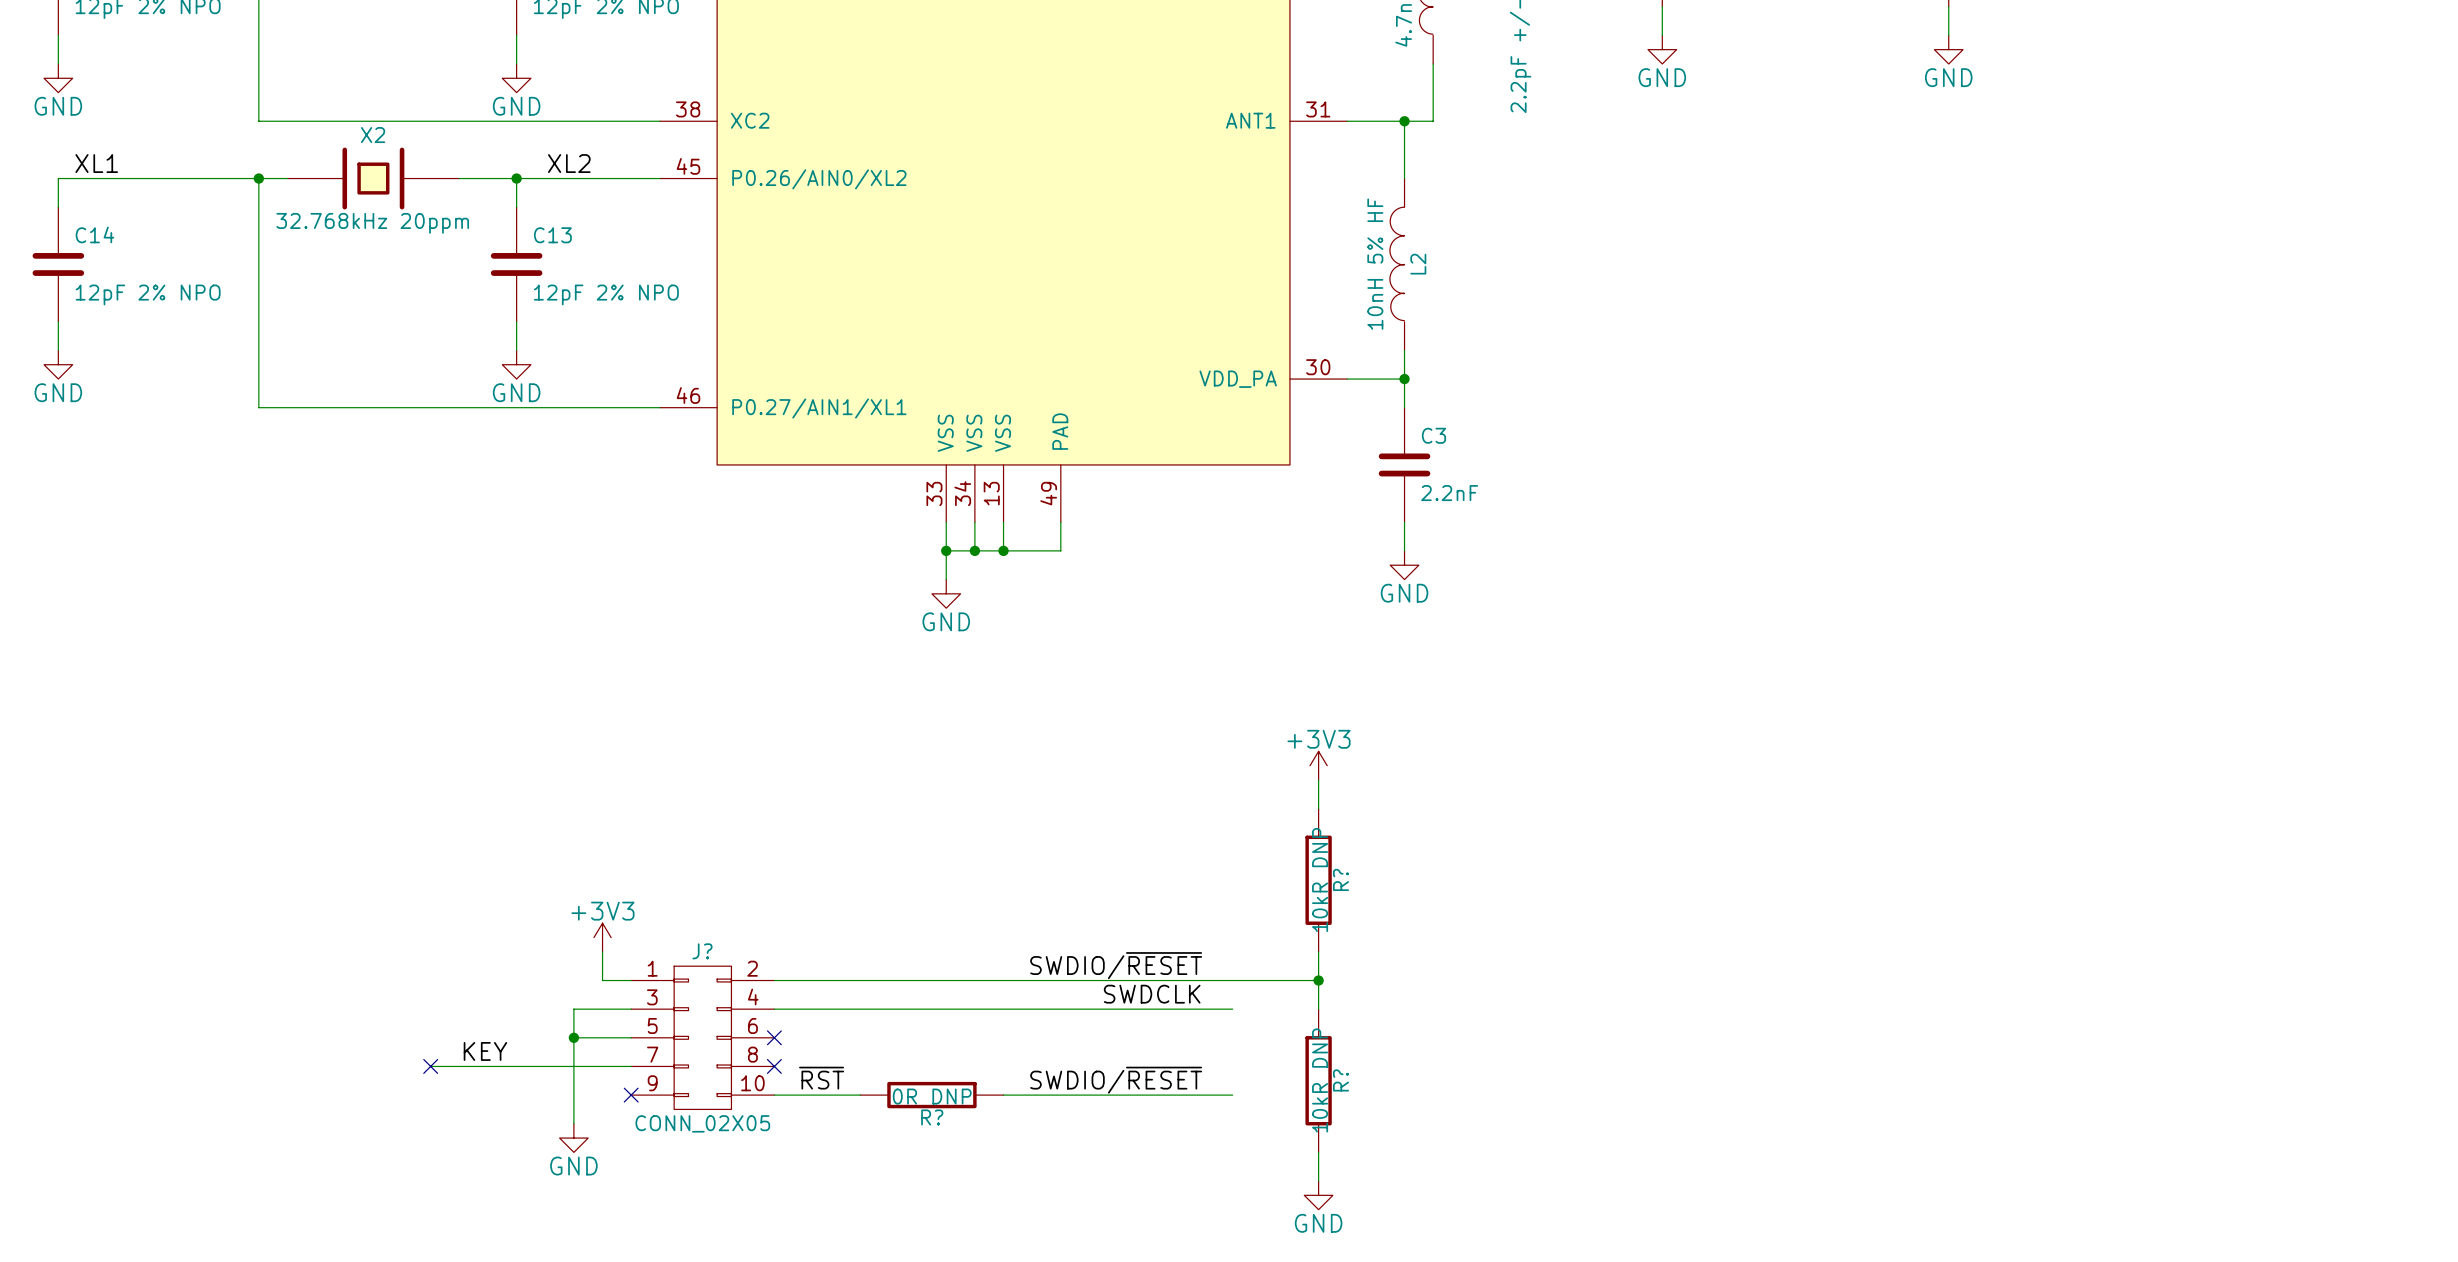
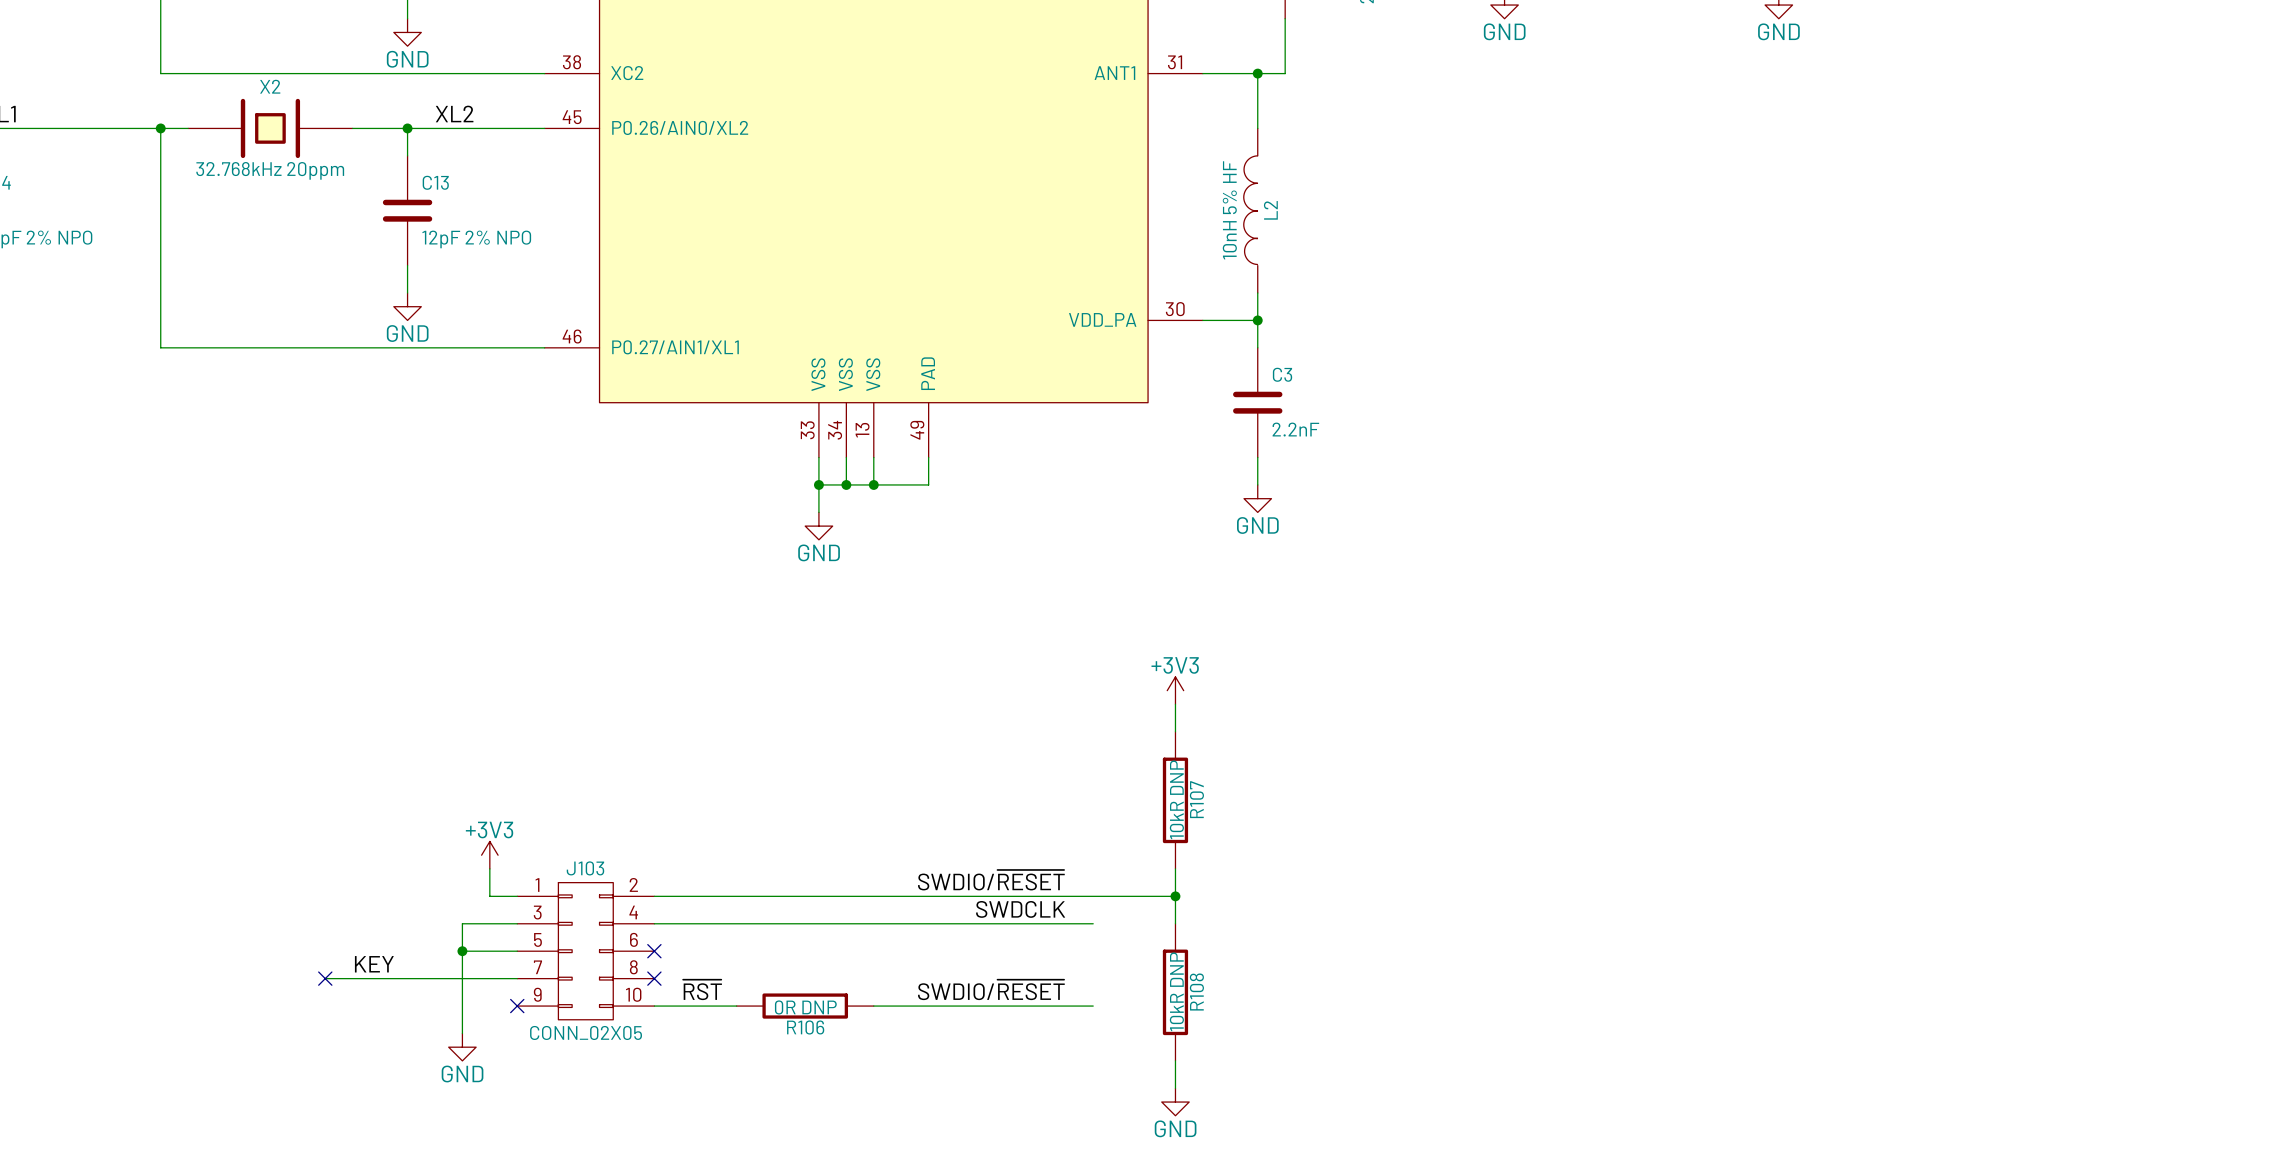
R? name: R? (1340, 879) -> R107 (1196, 799)
J? name: J? (702, 951) -> J103 (585, 868)
R? name: R? (1340, 1080) -> R108 (1196, 992)
R? name: R? (932, 1117) -> R106 (805, 1027)

